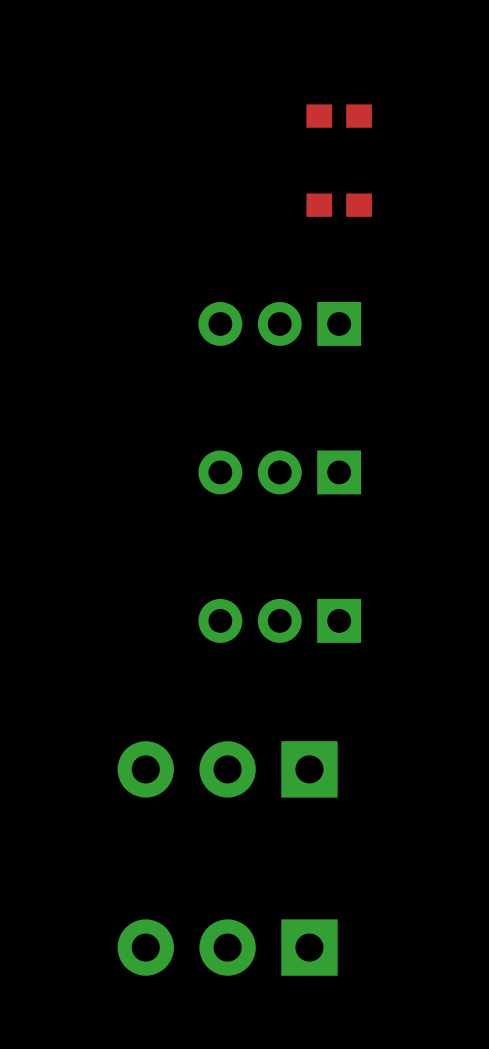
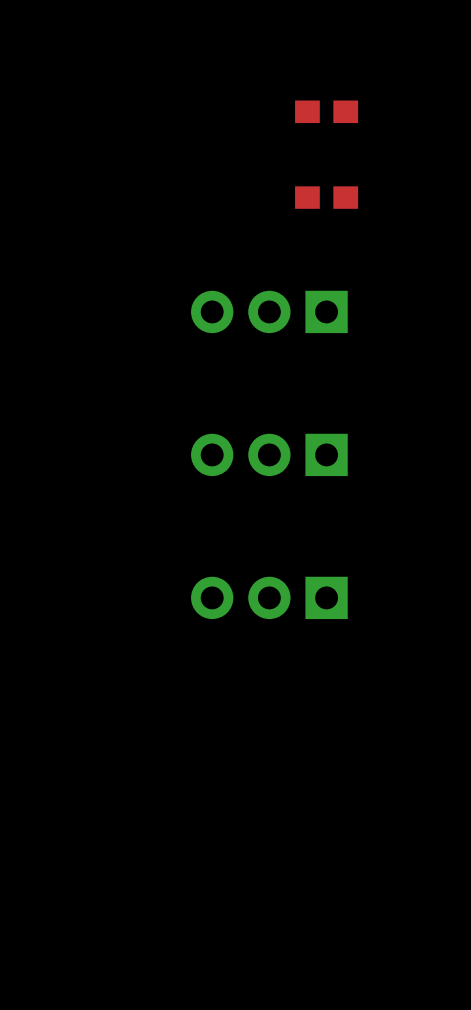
part: (227, 769) -> none
part: (227, 947) -> none

